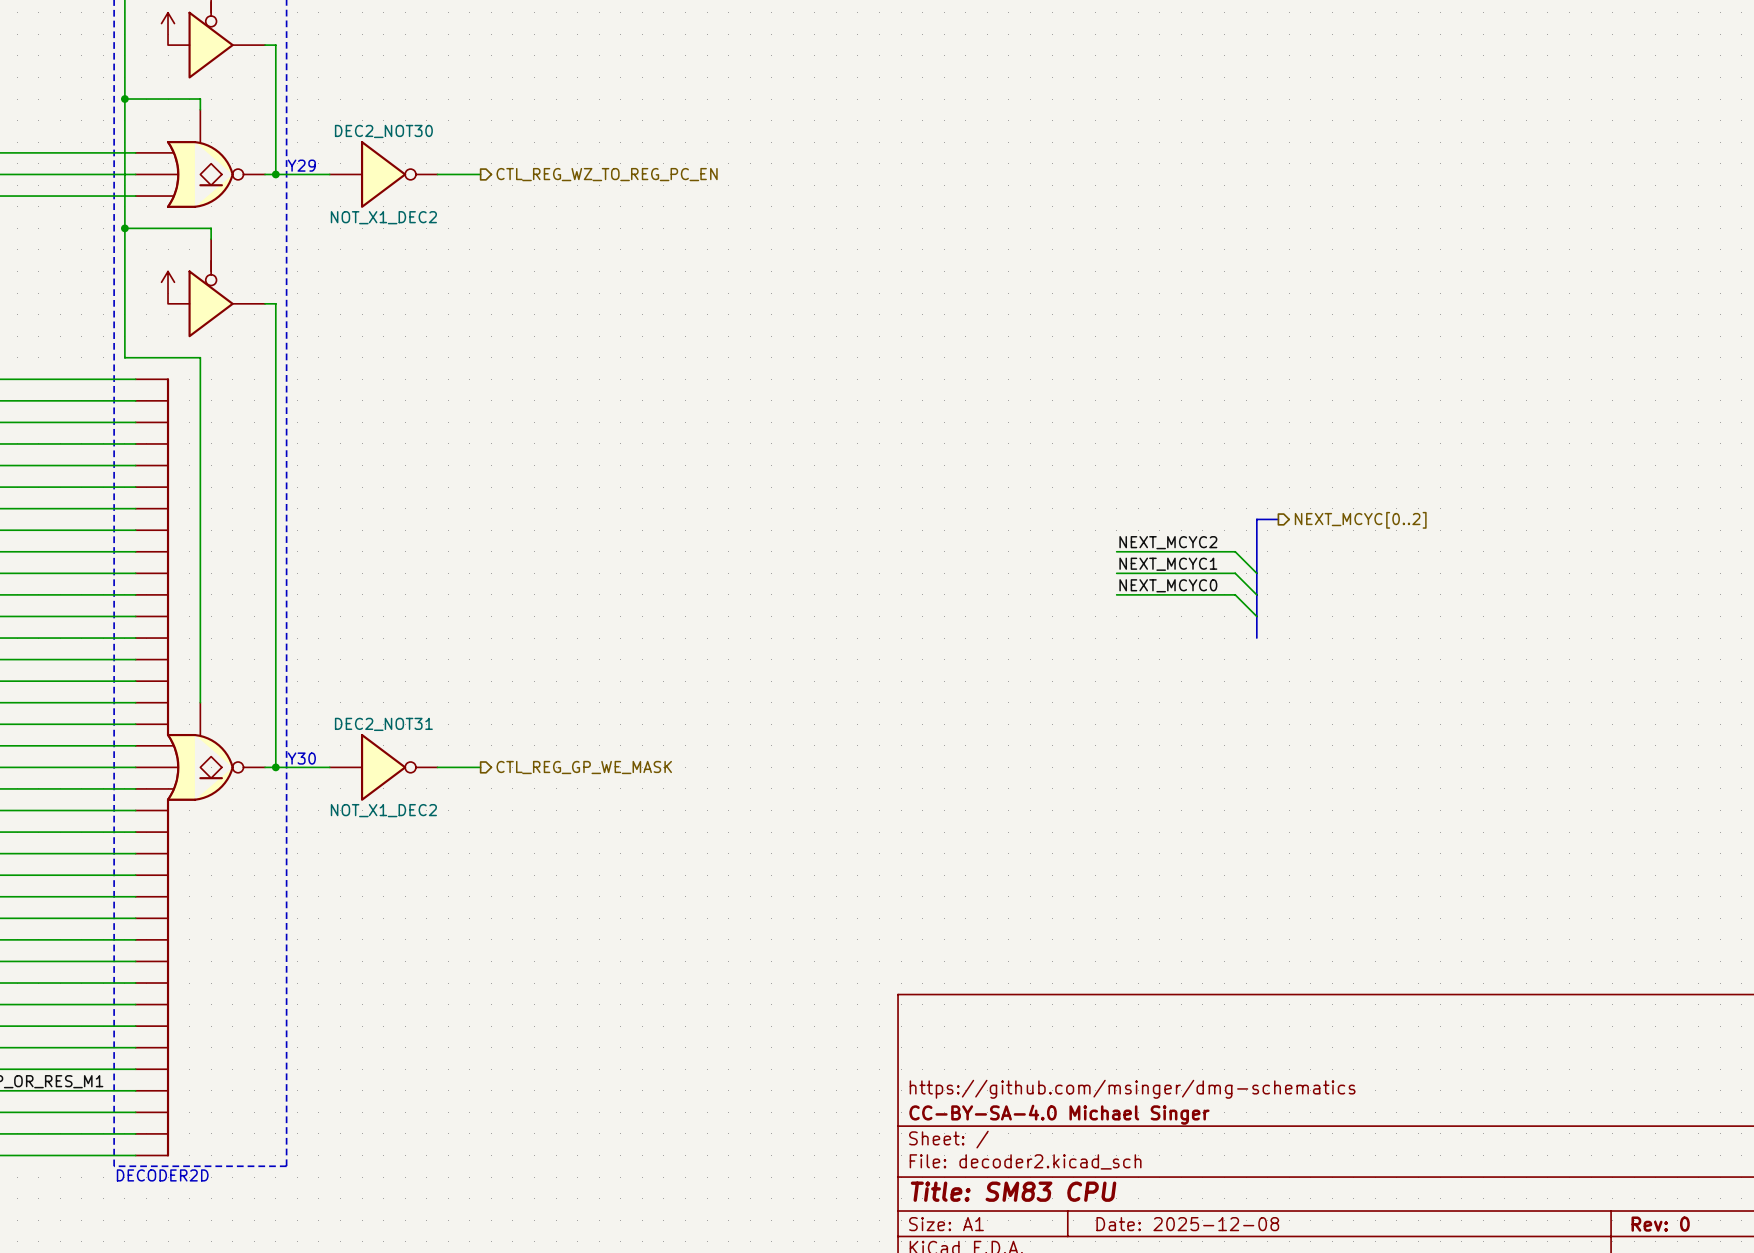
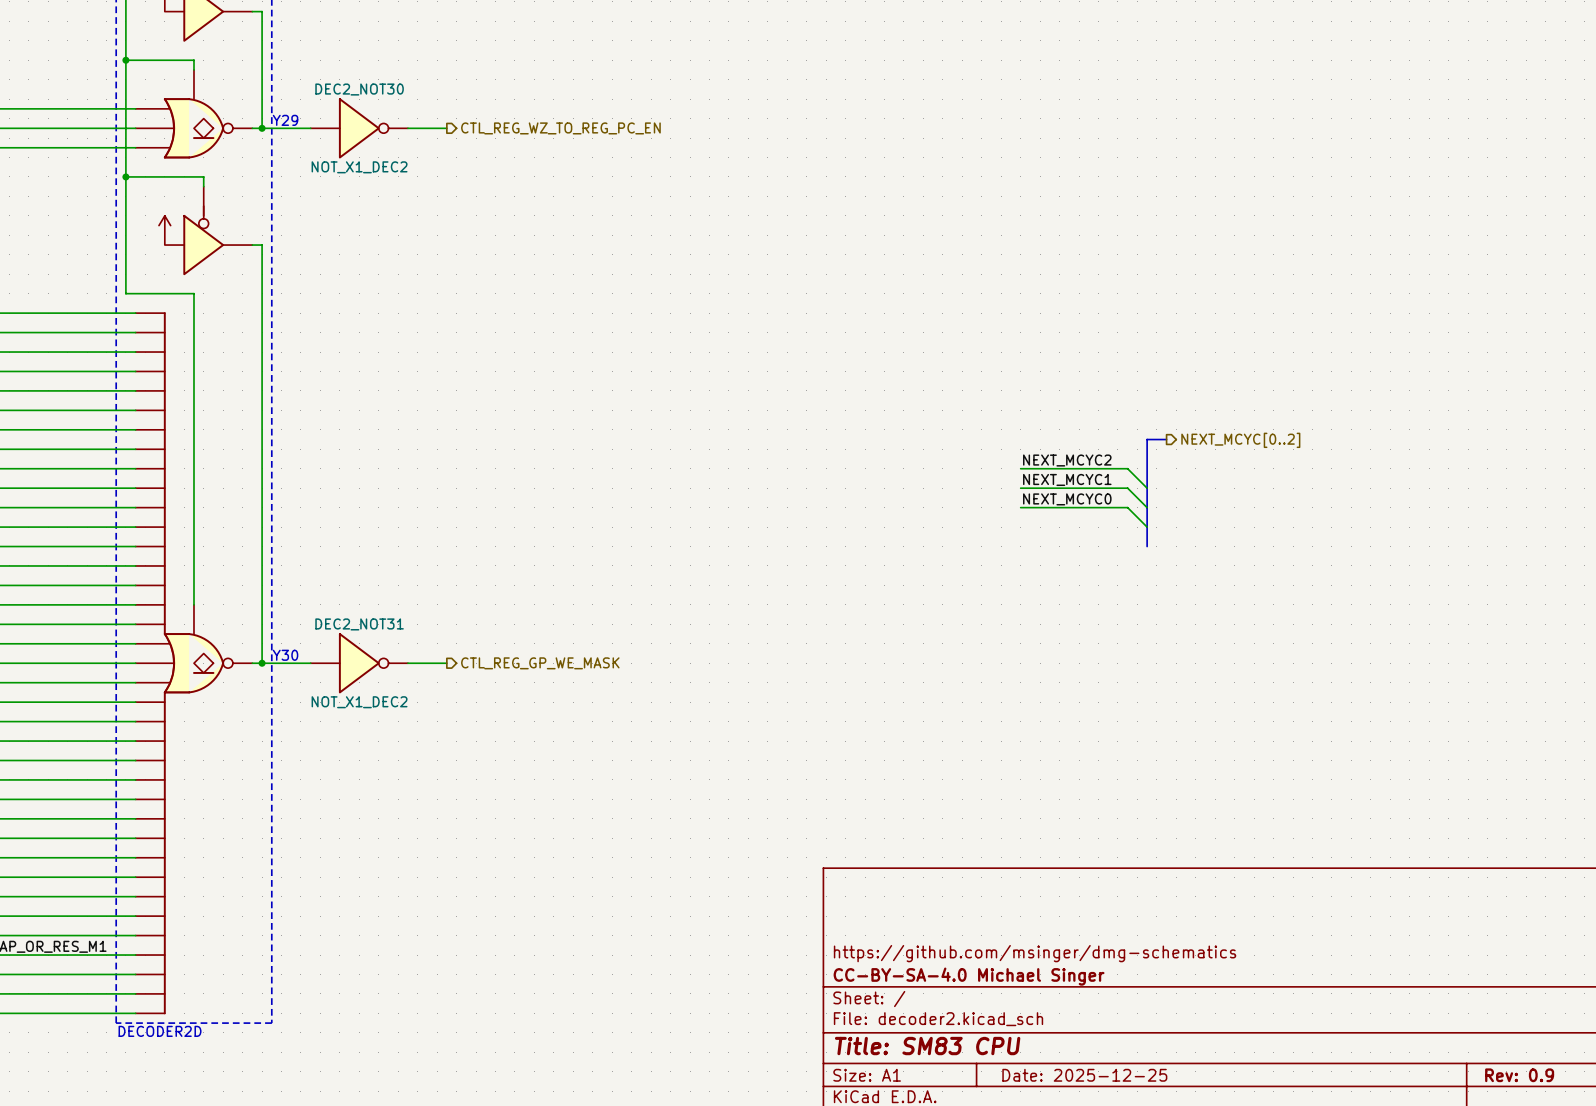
title block: Date: 2025-12-08 (1187, 1224) -> Date: 2025-12-25 (1084, 1075)
title block: Rev: 0 (1660, 1224) -> Rev: 0.9 (1519, 1075)

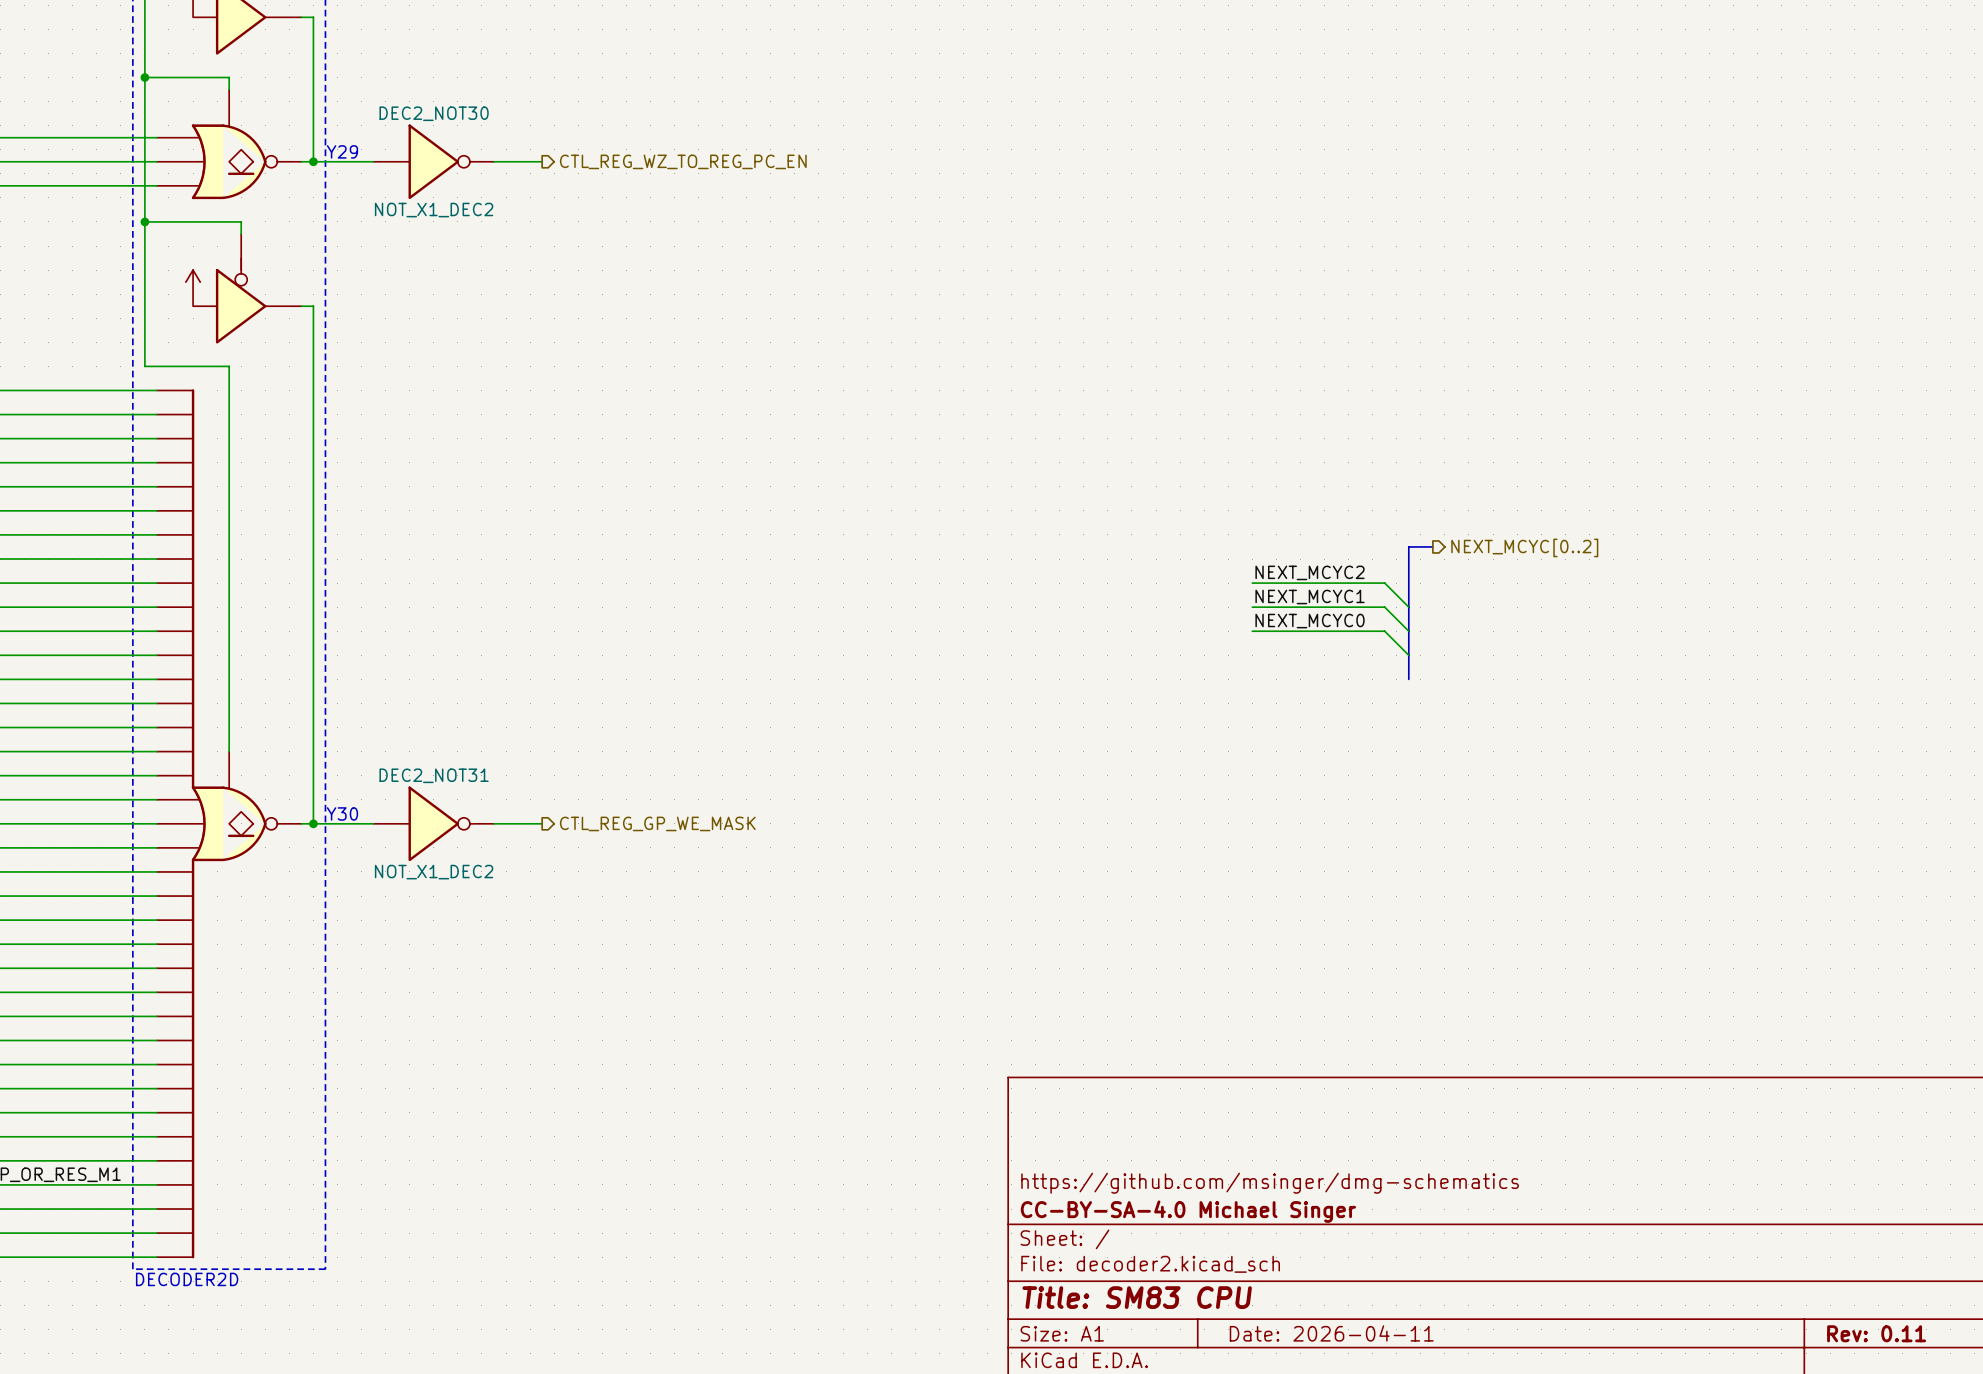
title block: Date: 2025-12-25 (1084, 1075) -> Date: 2026-04-11 (1331, 1333)
title block: Rev: 0.9 (1519, 1075) -> Rev: 0.11 (1876, 1333)

